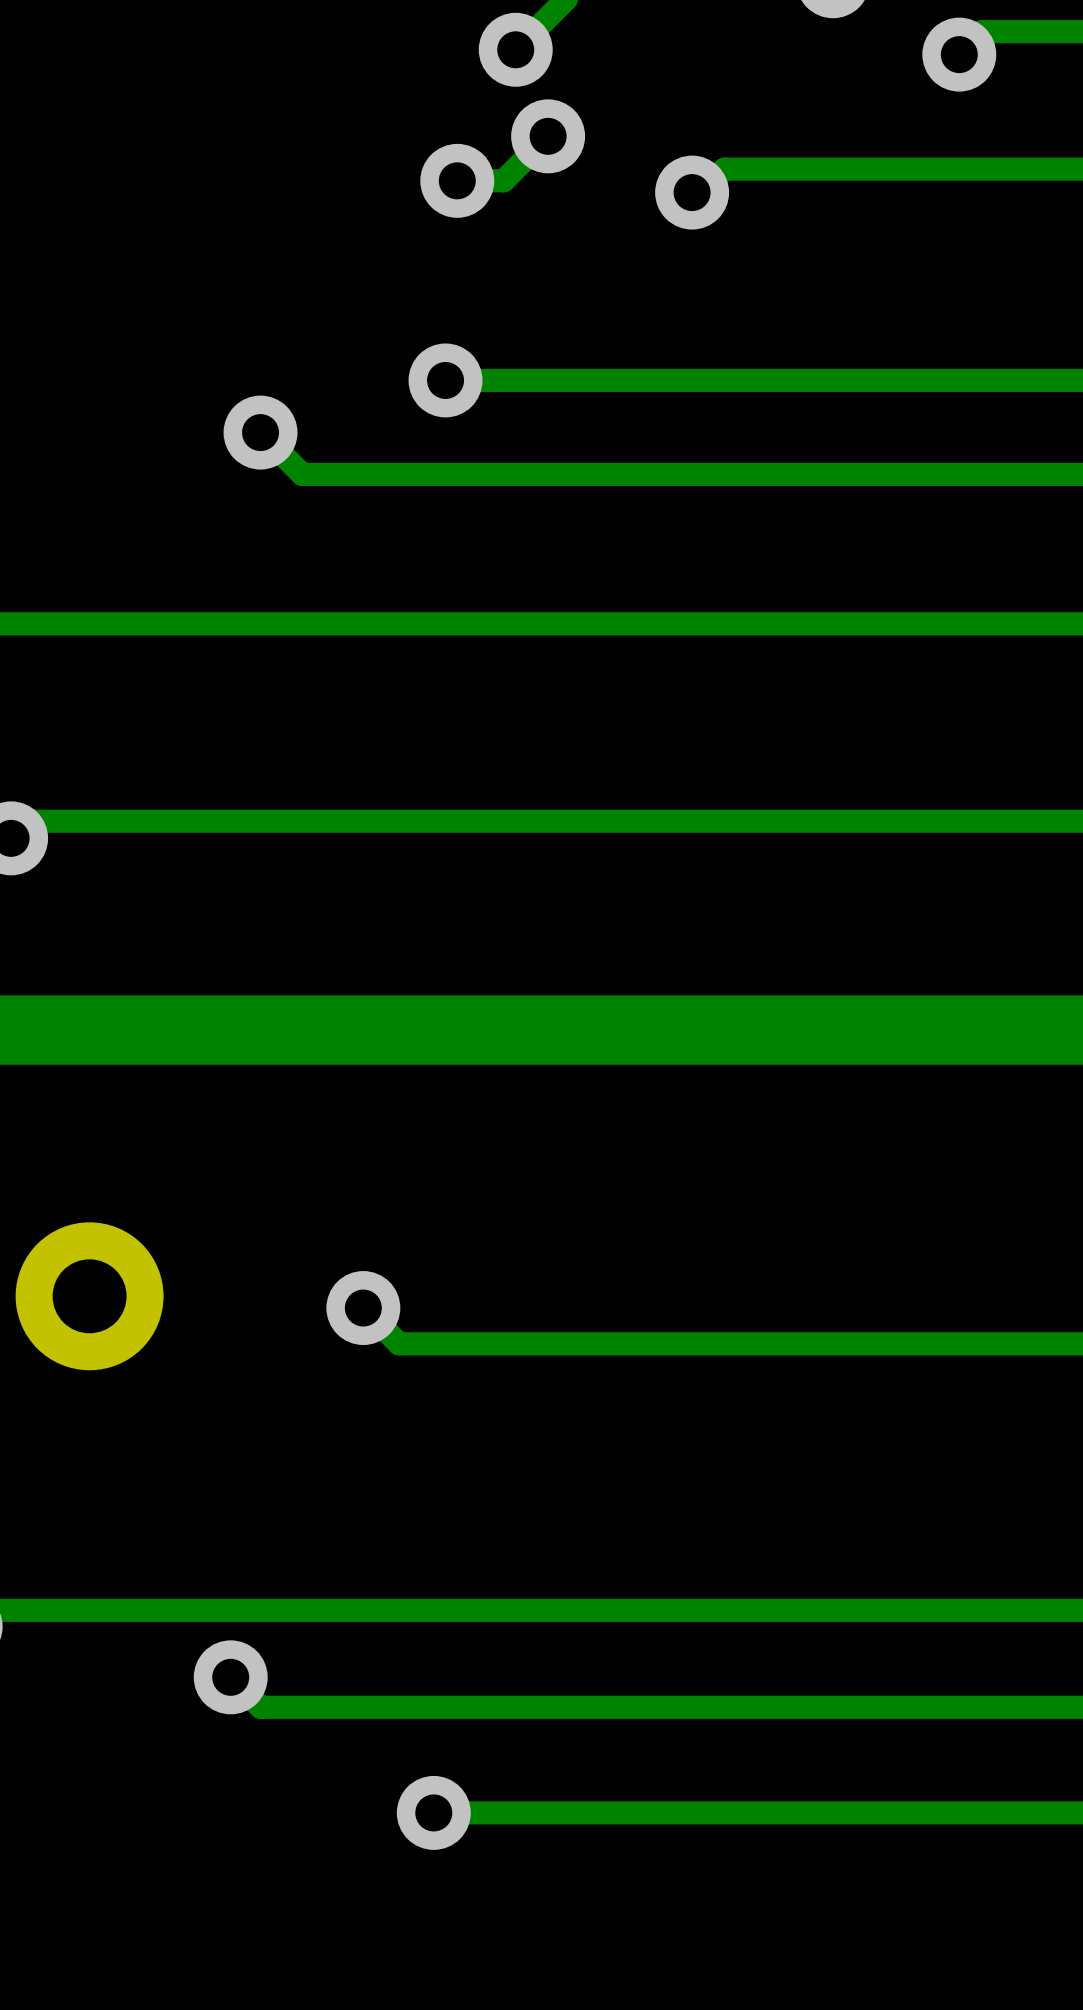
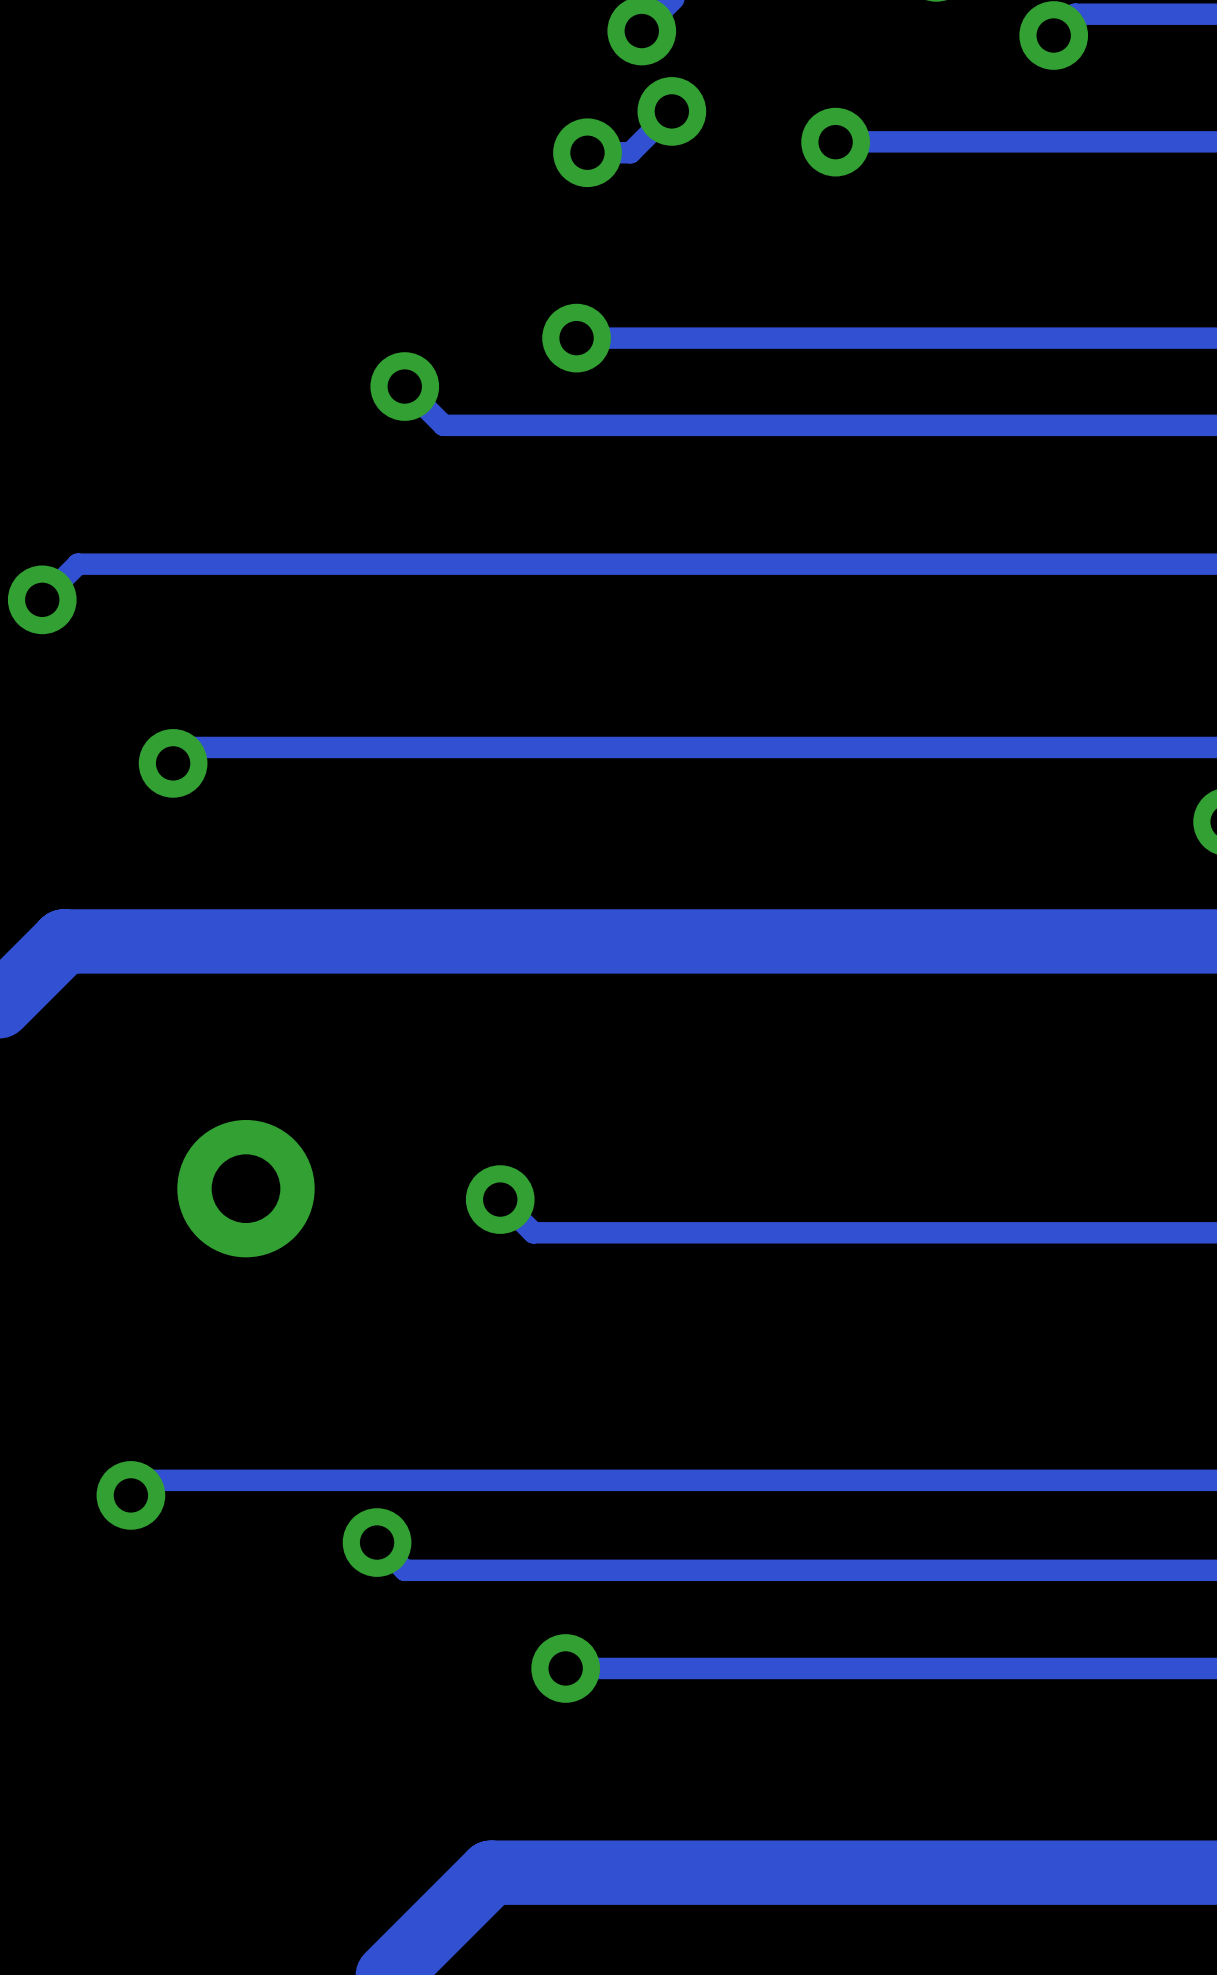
via position: (692, 192) -> (835, 142)

